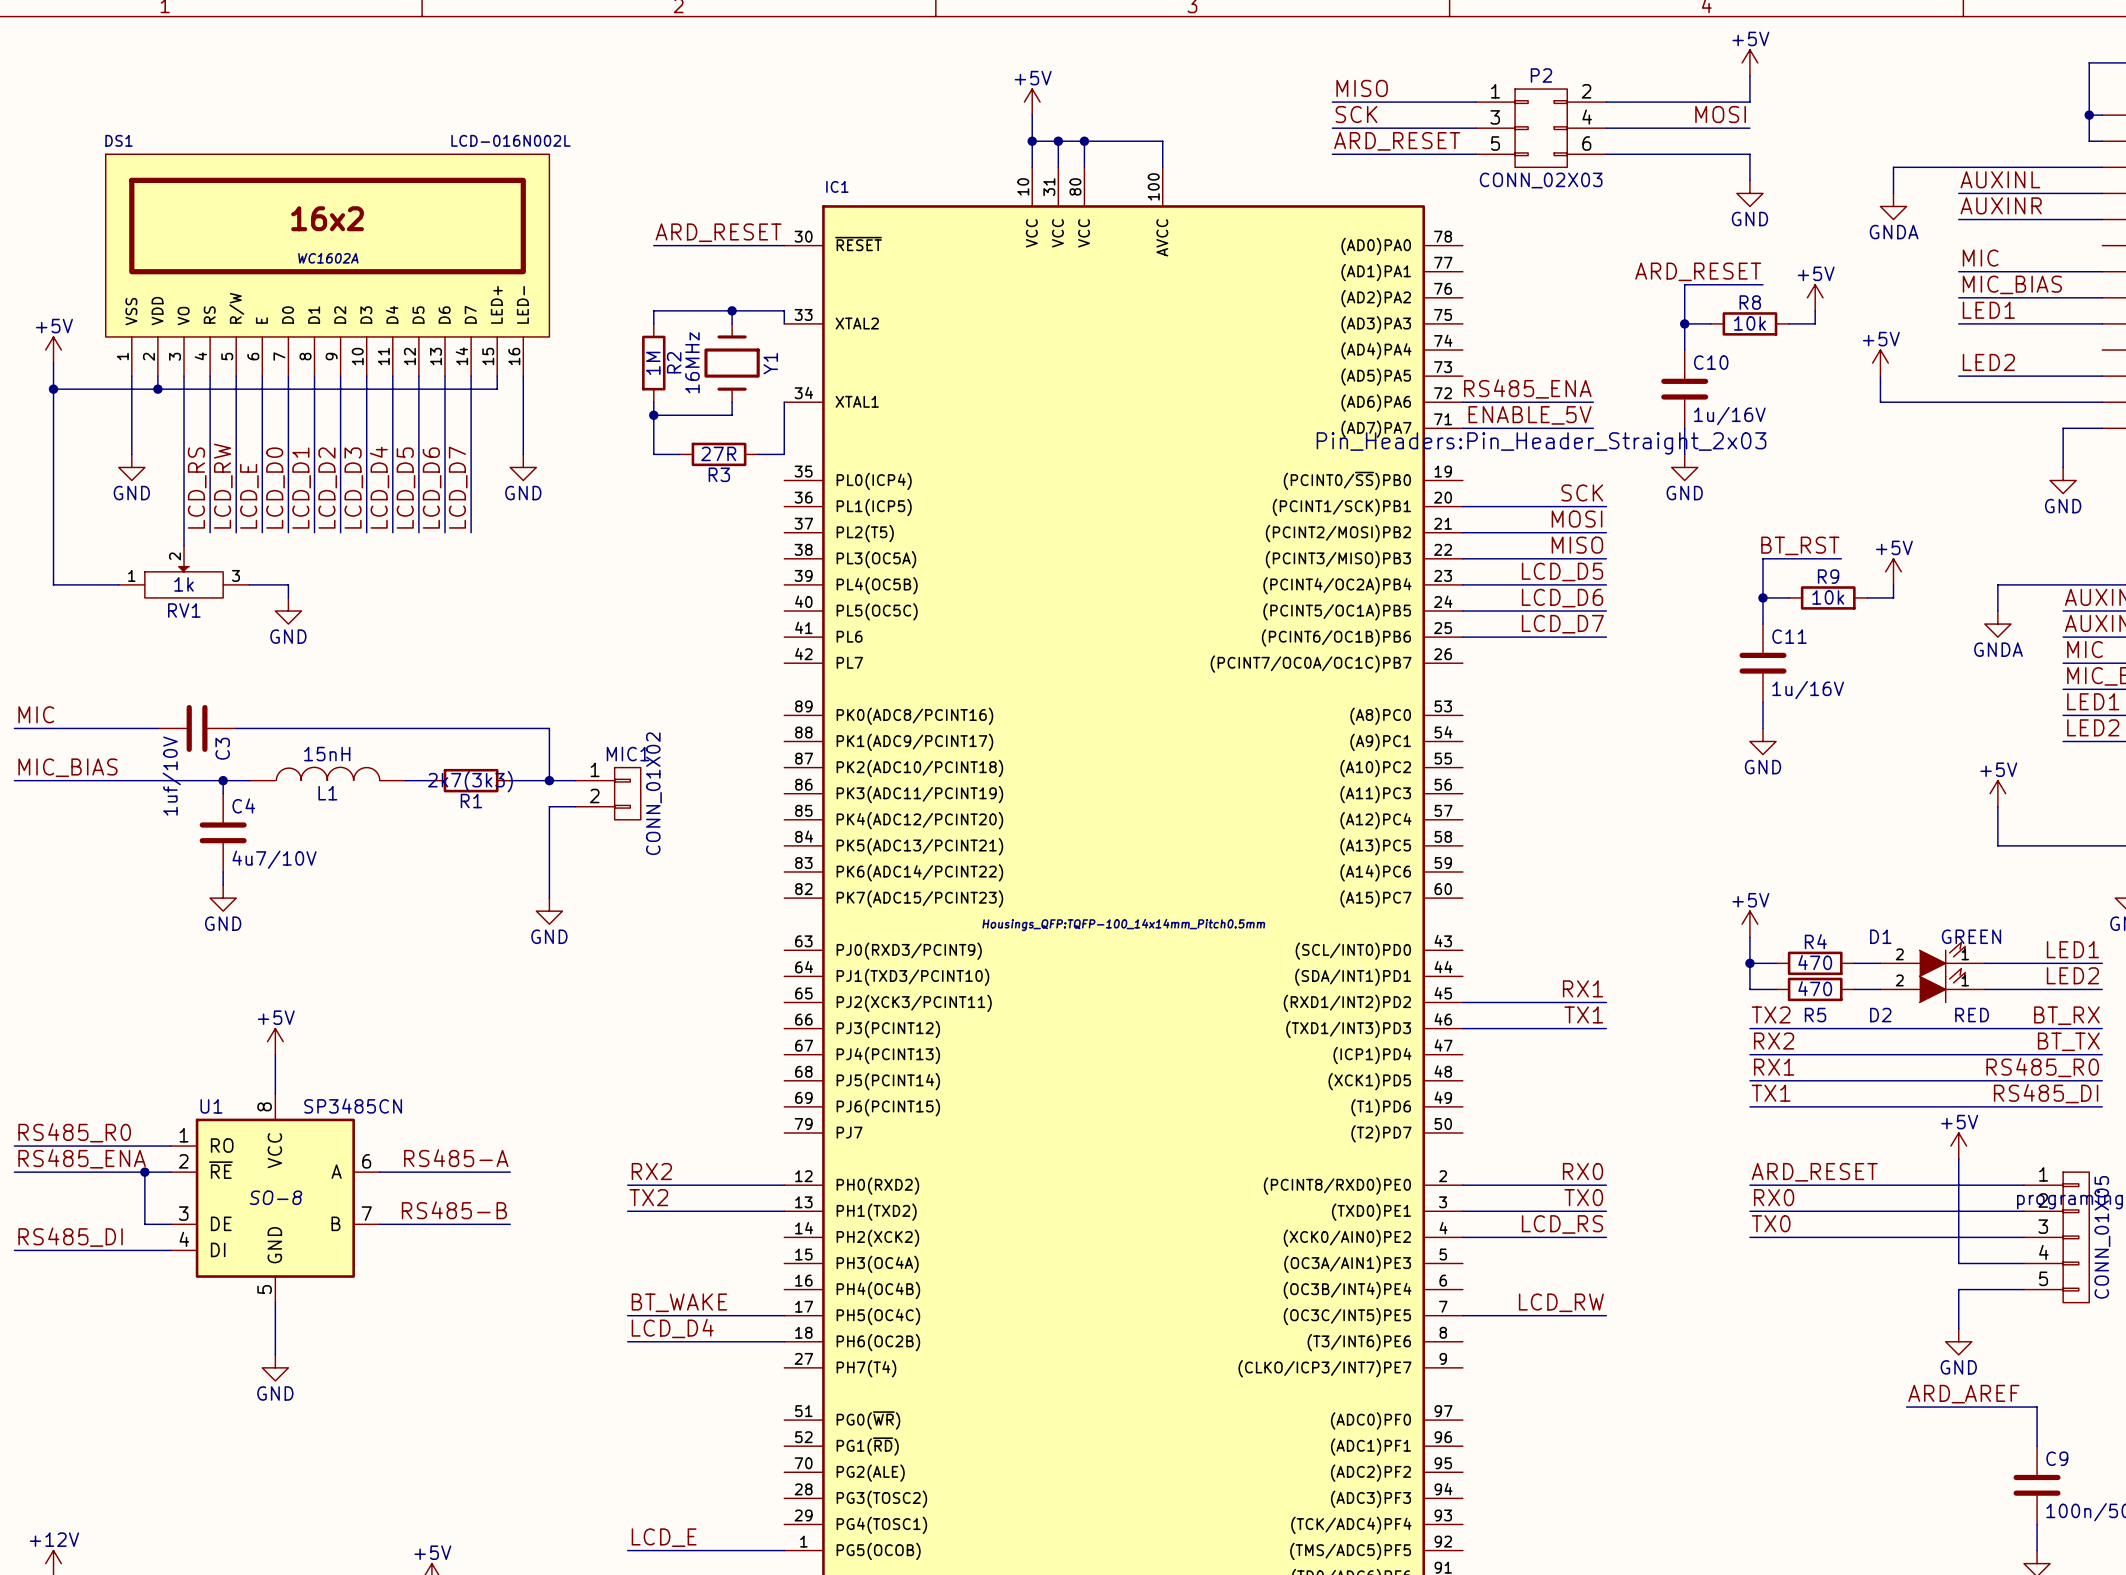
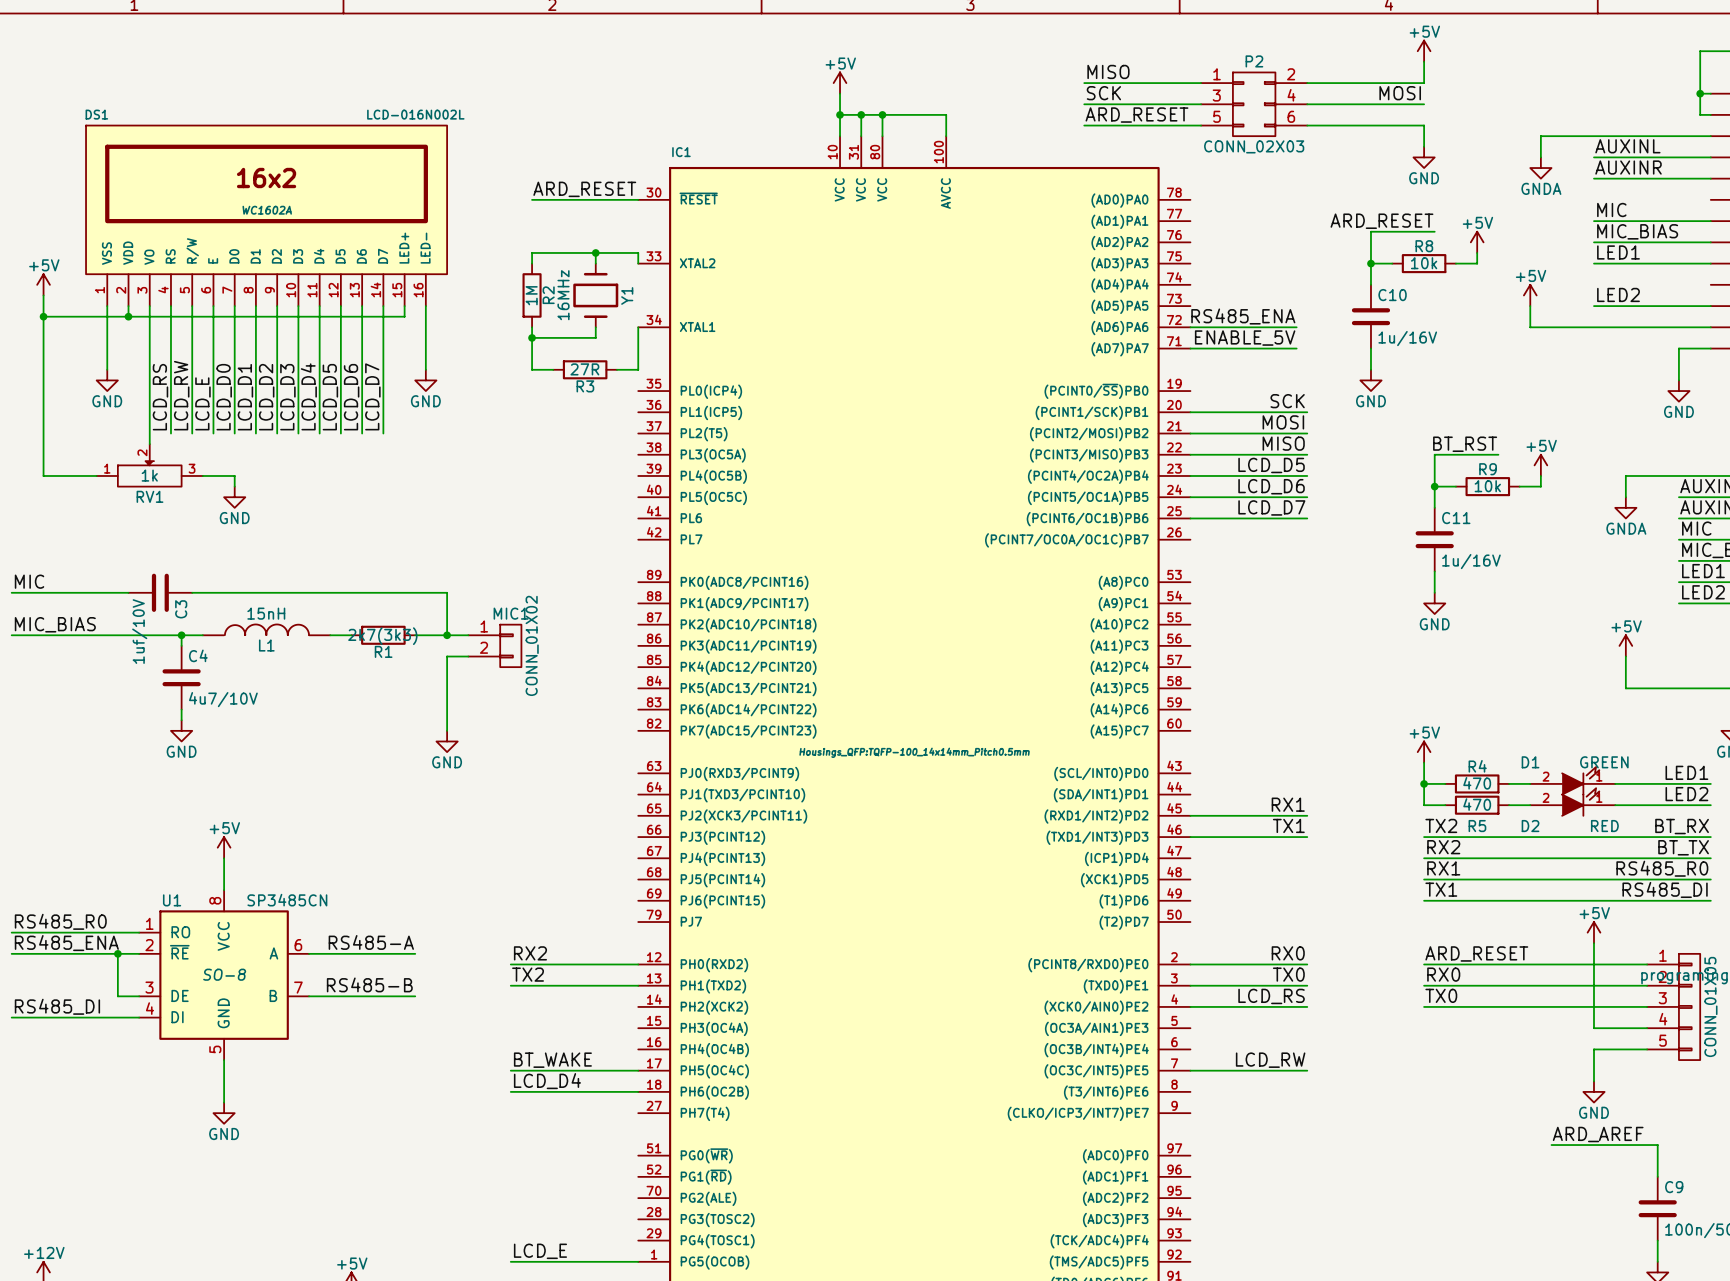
P2 text: Pin_Headers:Pin_Header_Straight_2x03 (1541, 443) -> none

